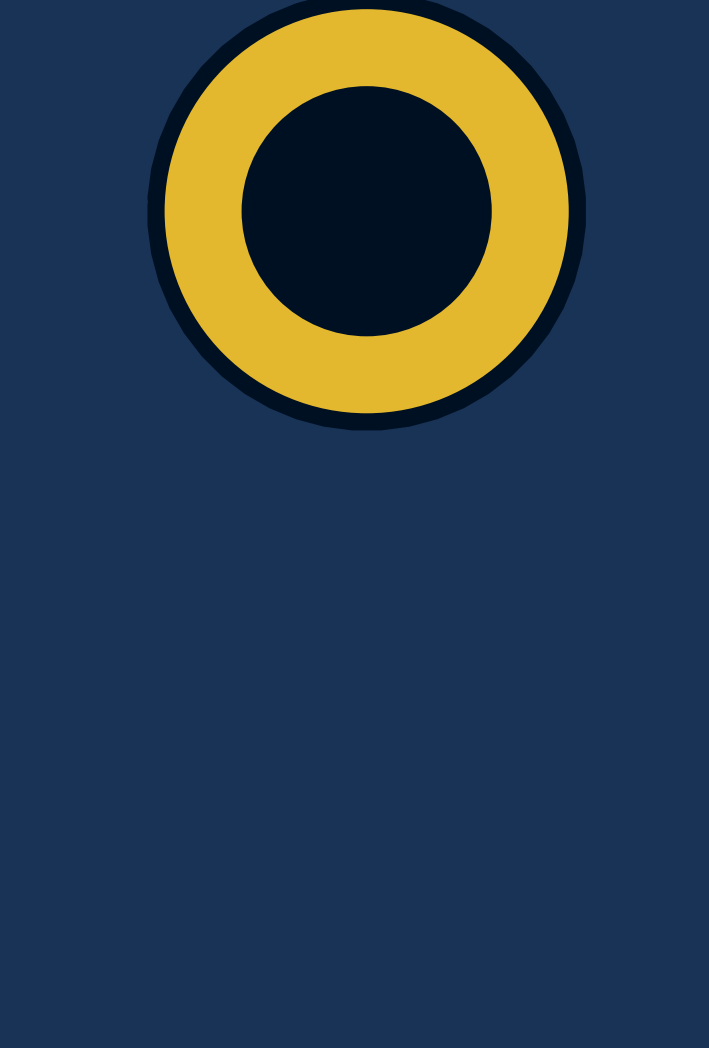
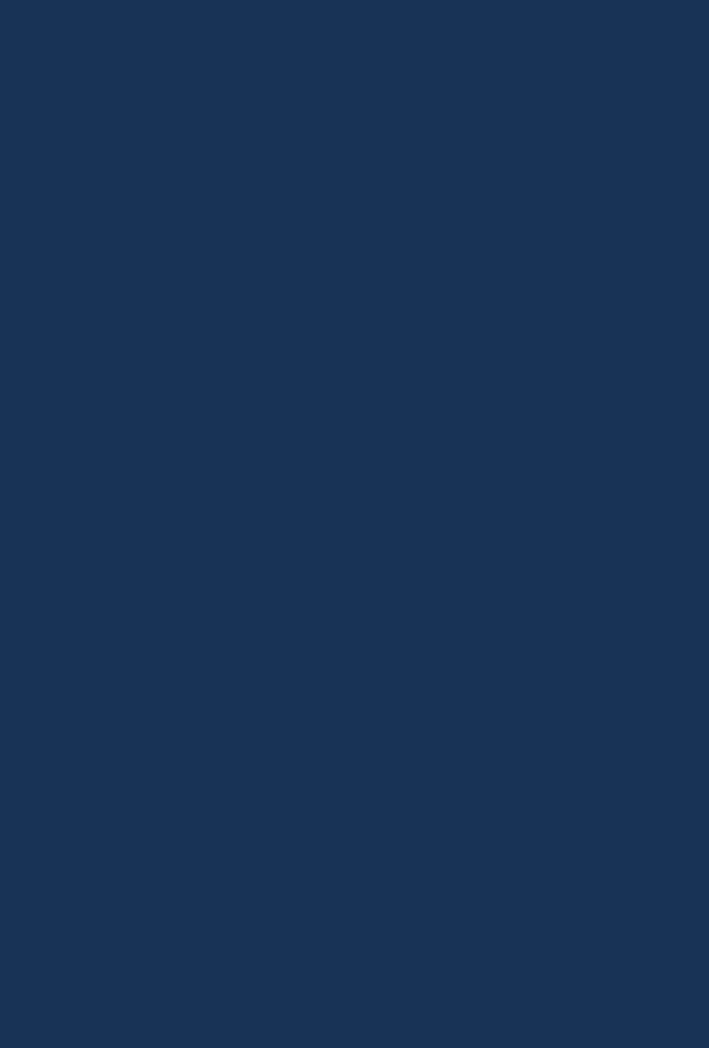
part: (366, 211) -> none

